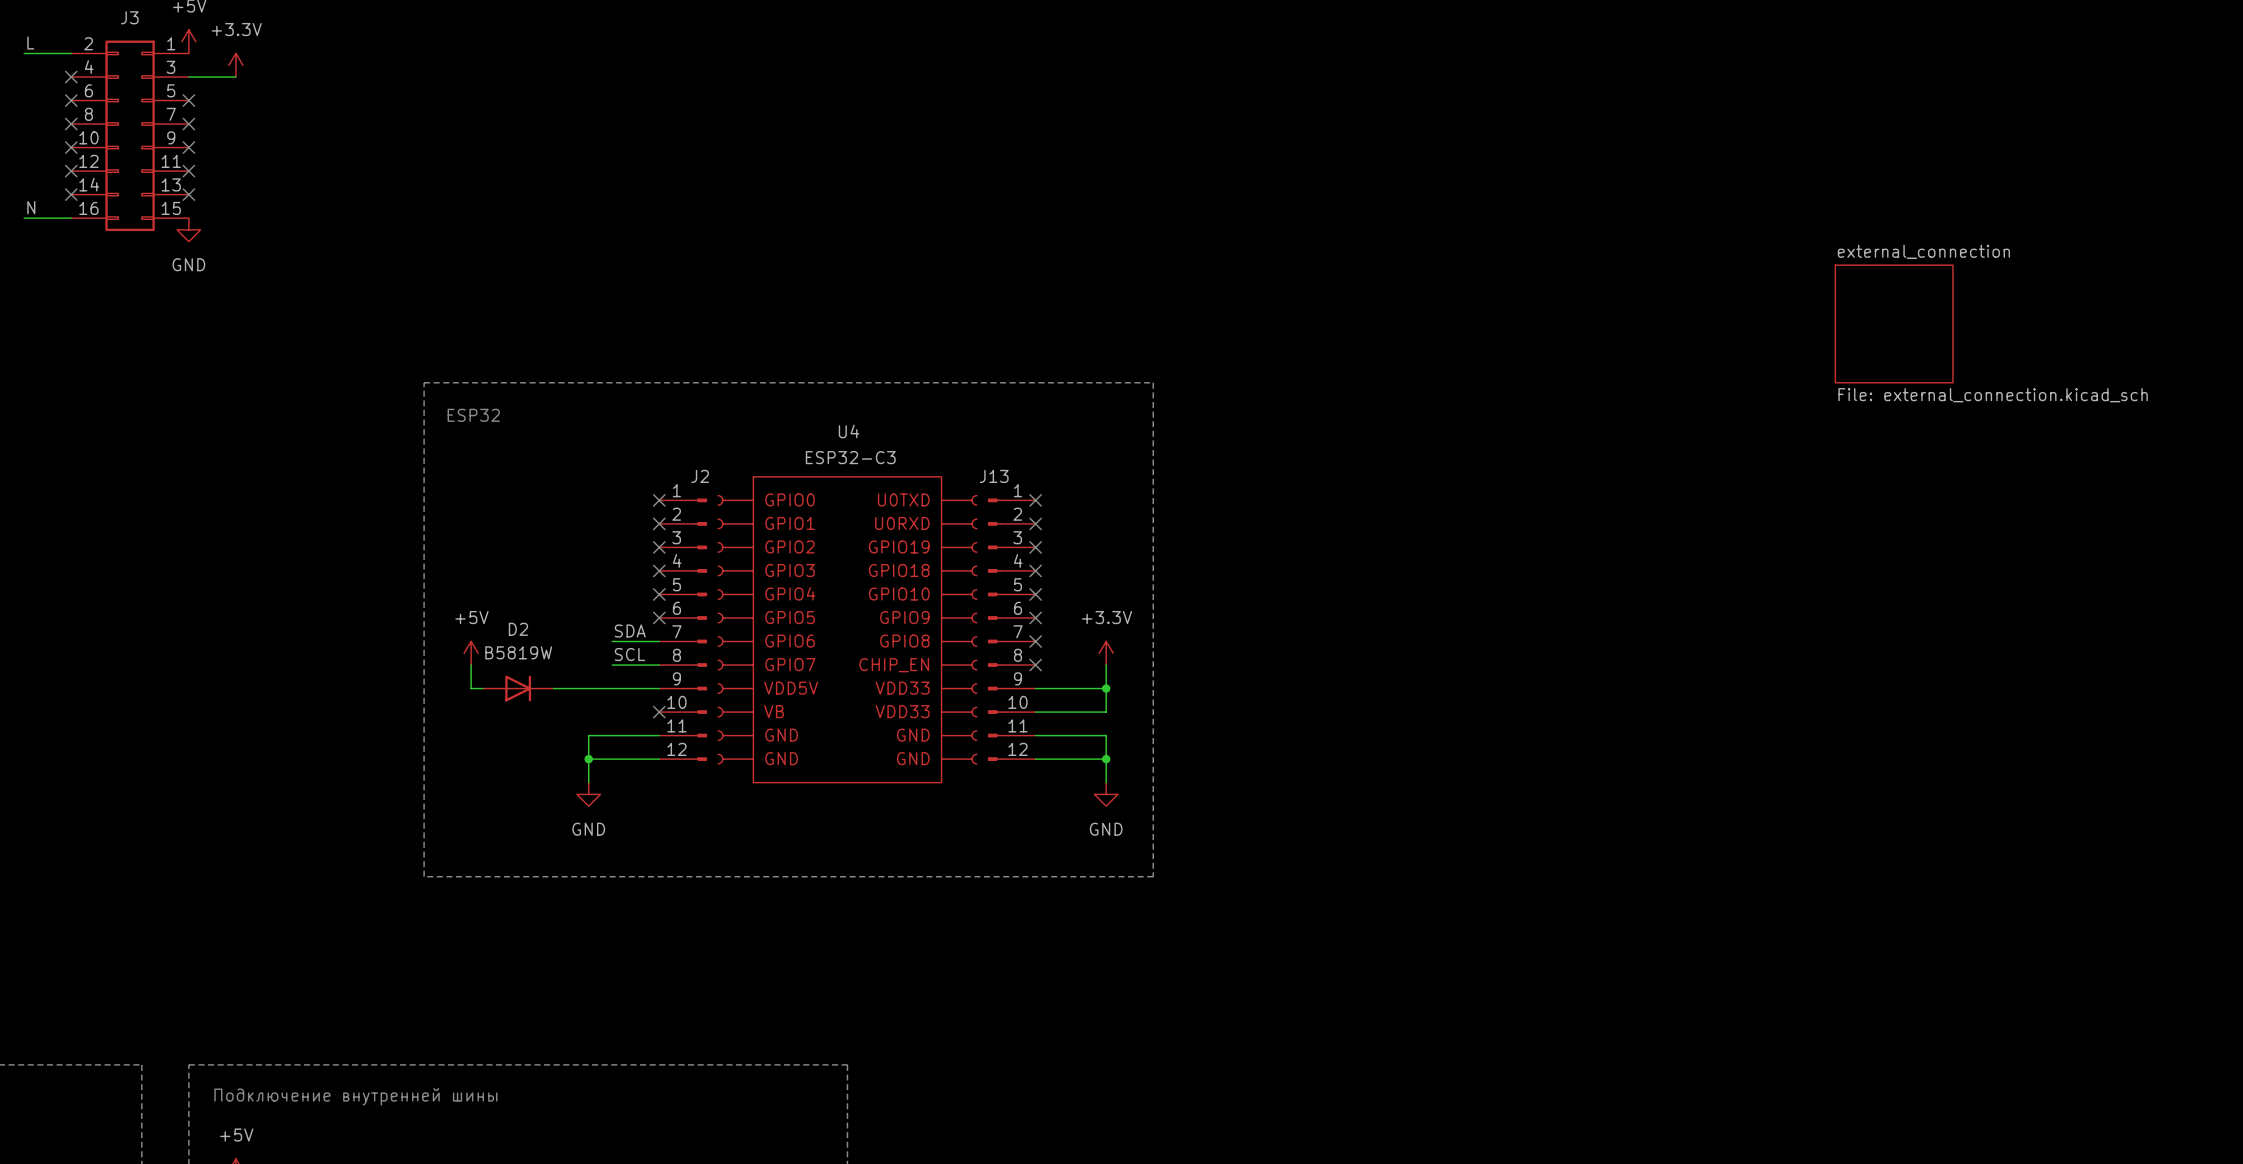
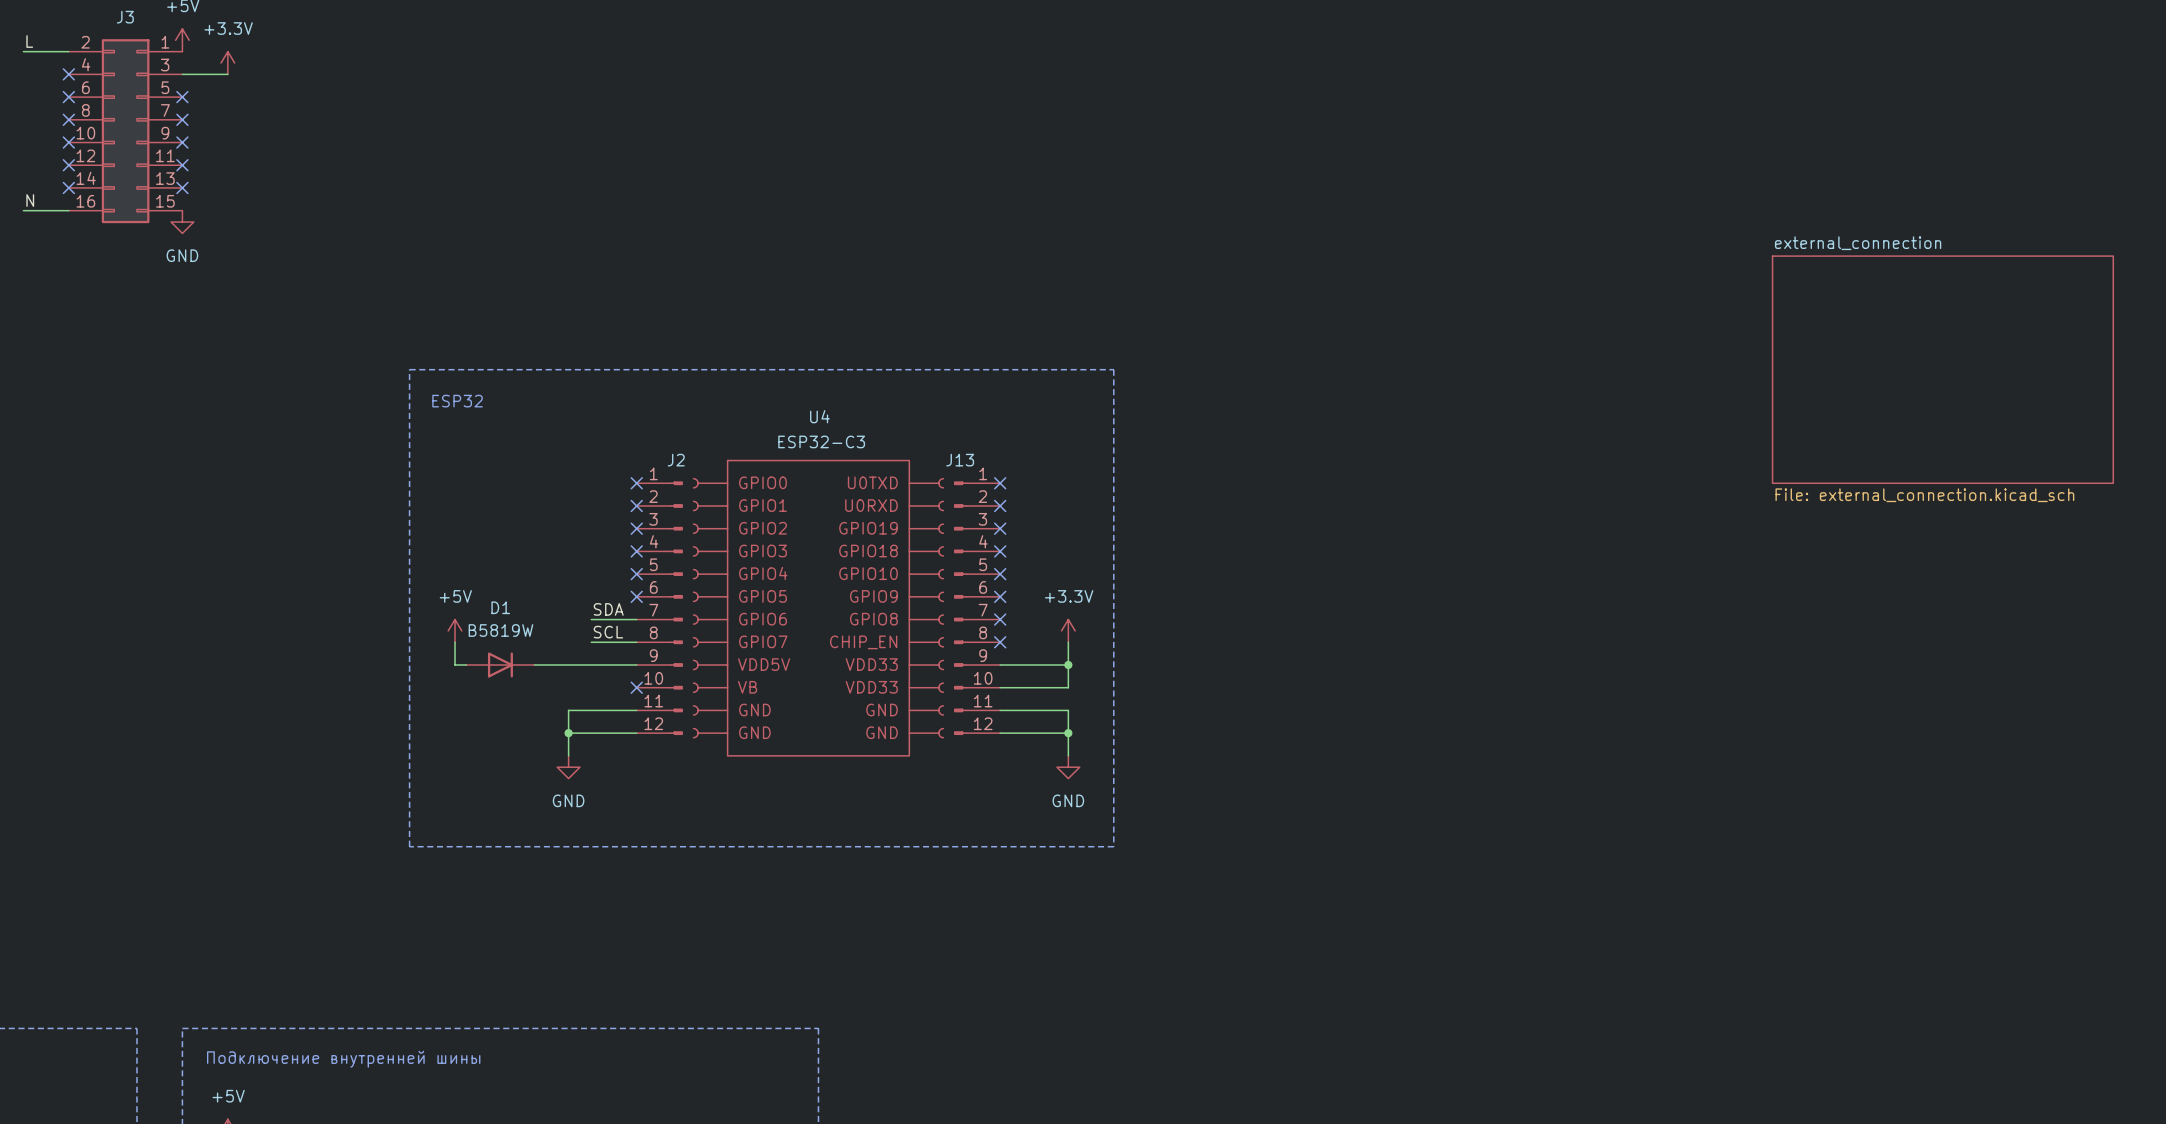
sheet external_connection: File: external_connection.kicad_sch (1894, 323) -> none
sheet external_connection: none -> File: external_connection.kicad_sch (1942, 369)
D2 name: D2 (518, 629) -> D1 (500, 607)

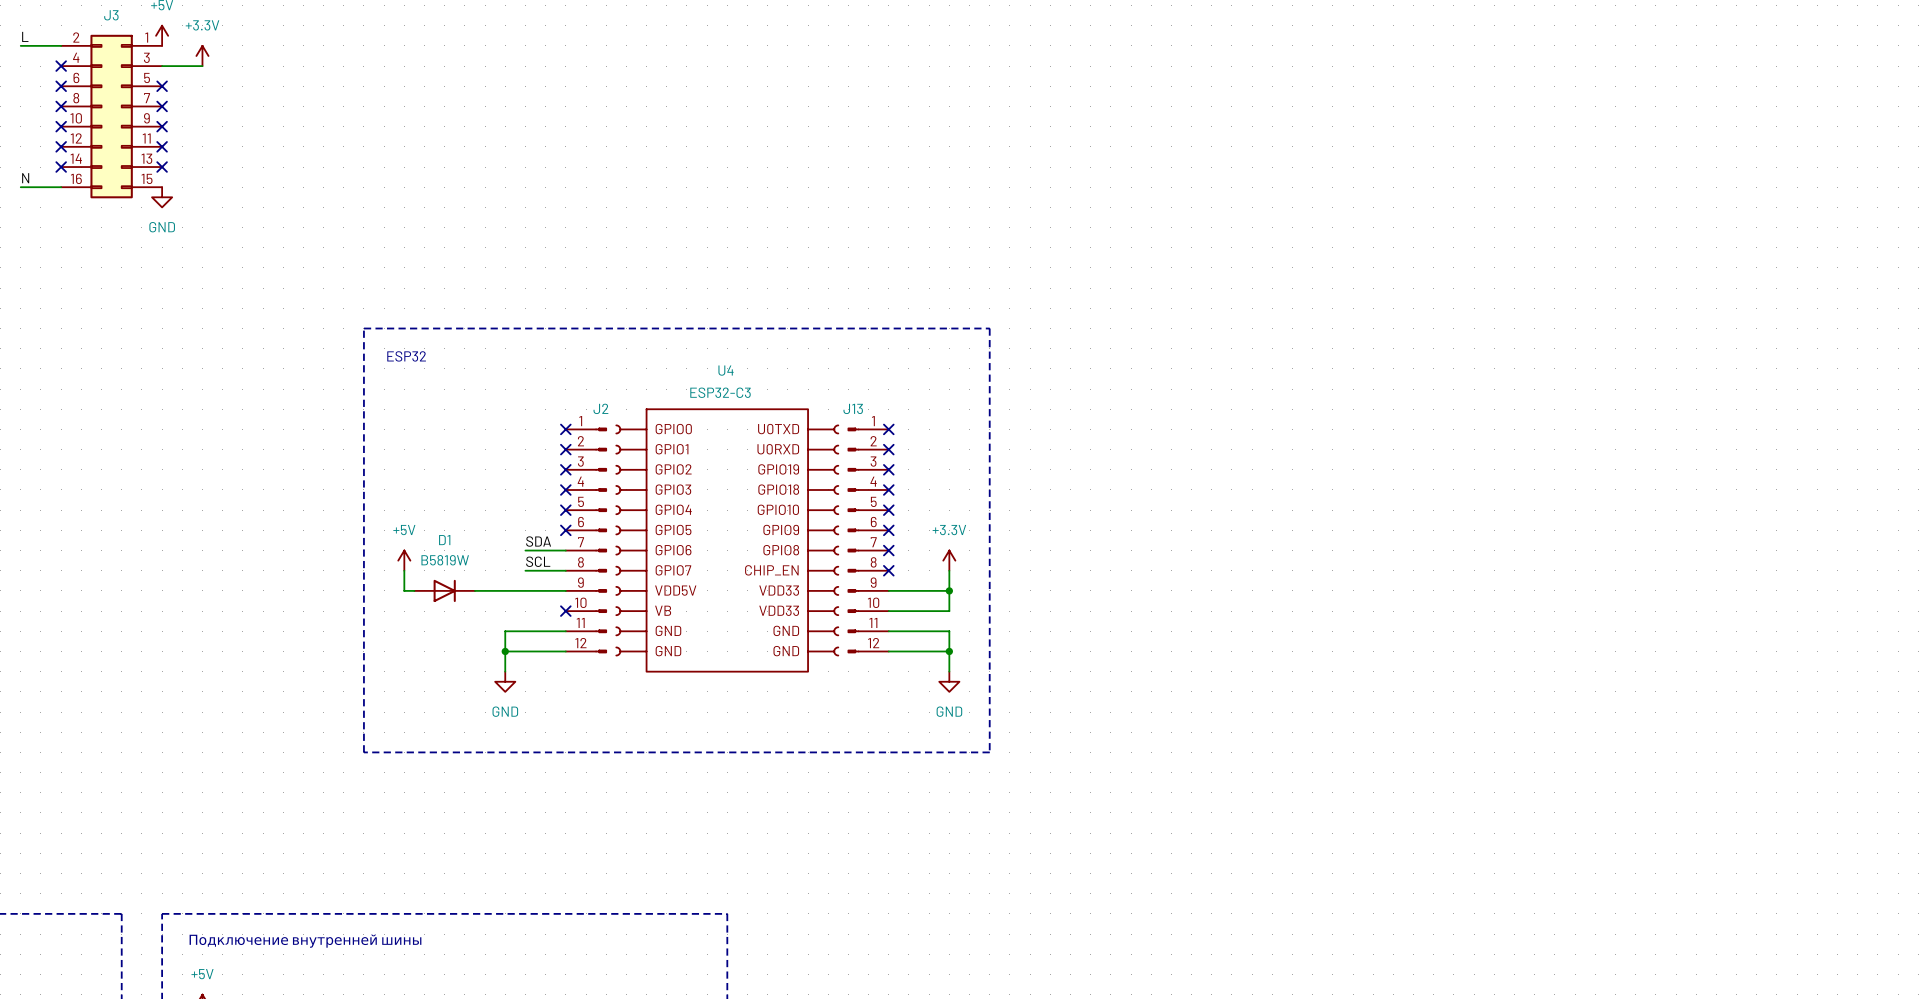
sheet external_connection: File: external_connection.kicad_sch (1942, 369) -> none

